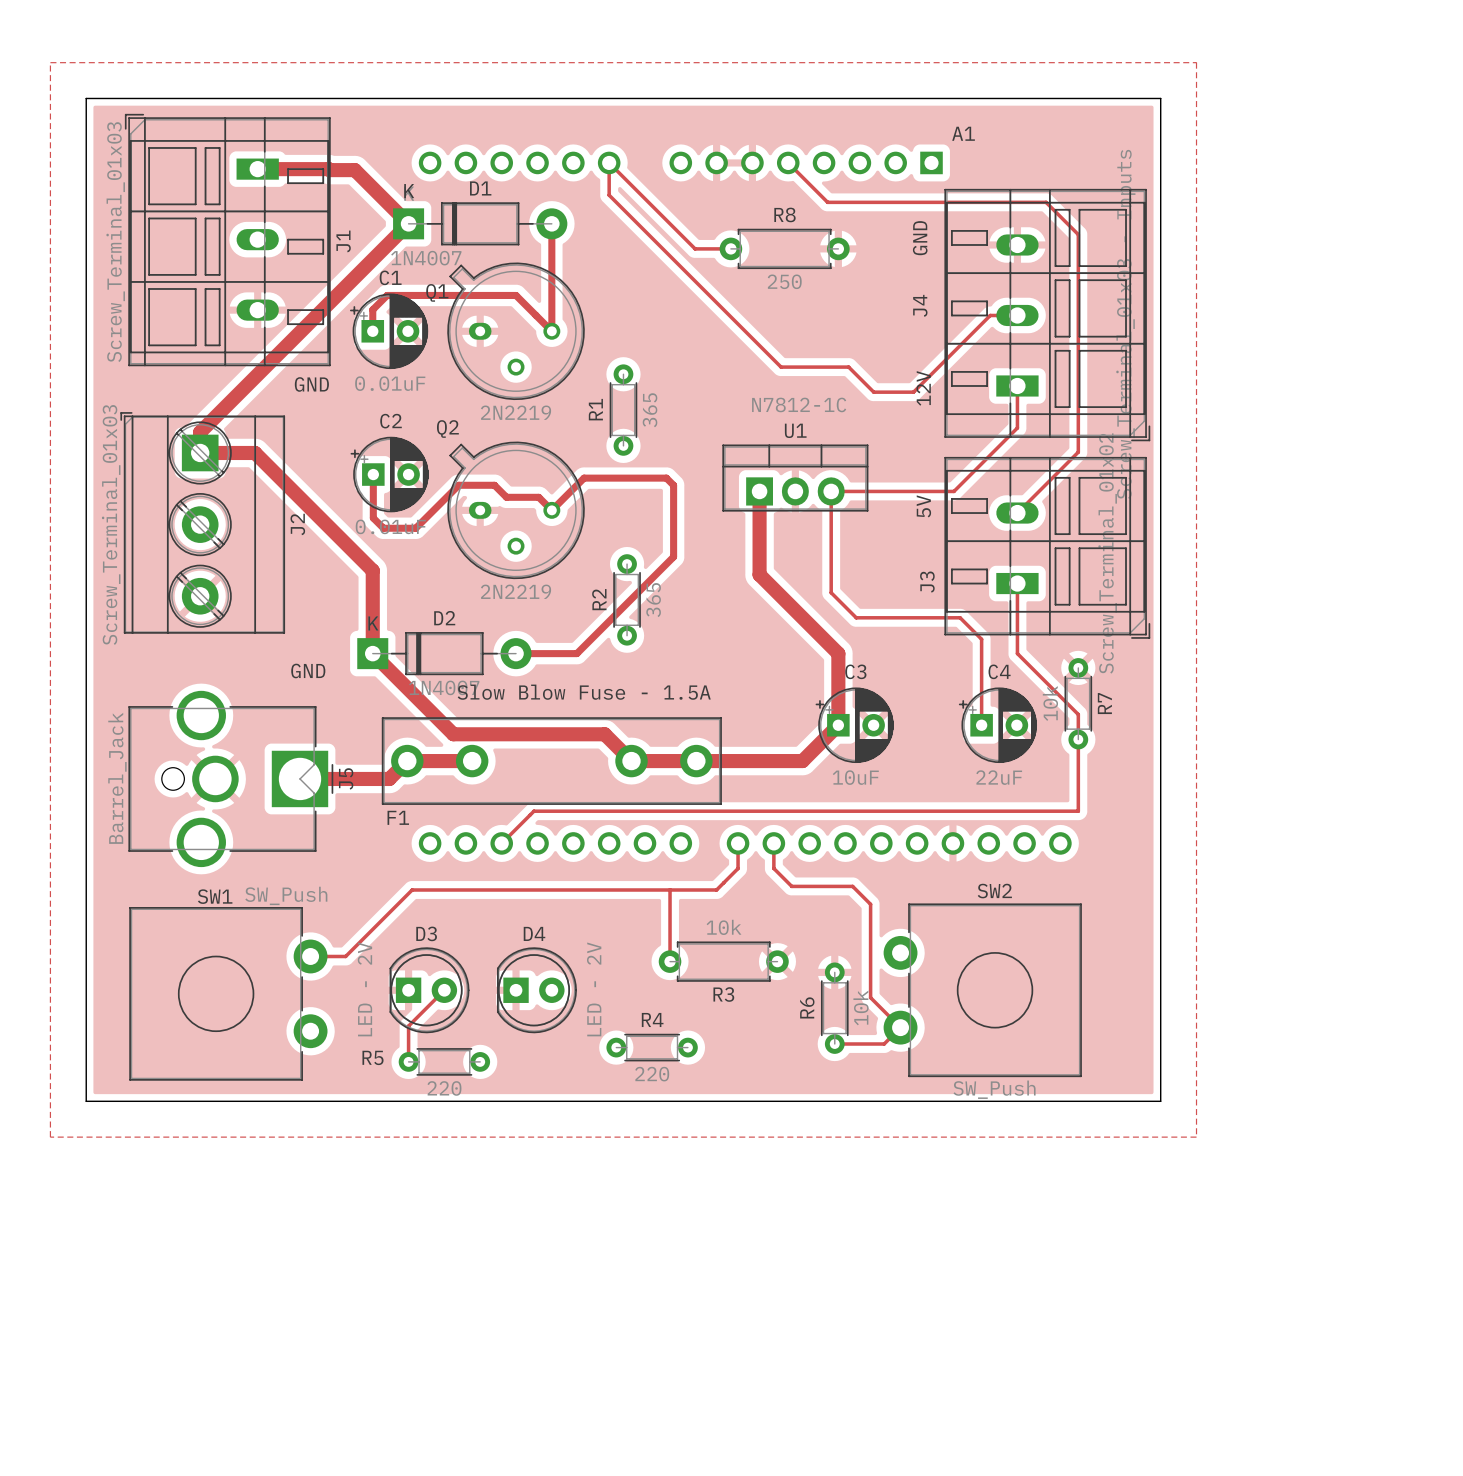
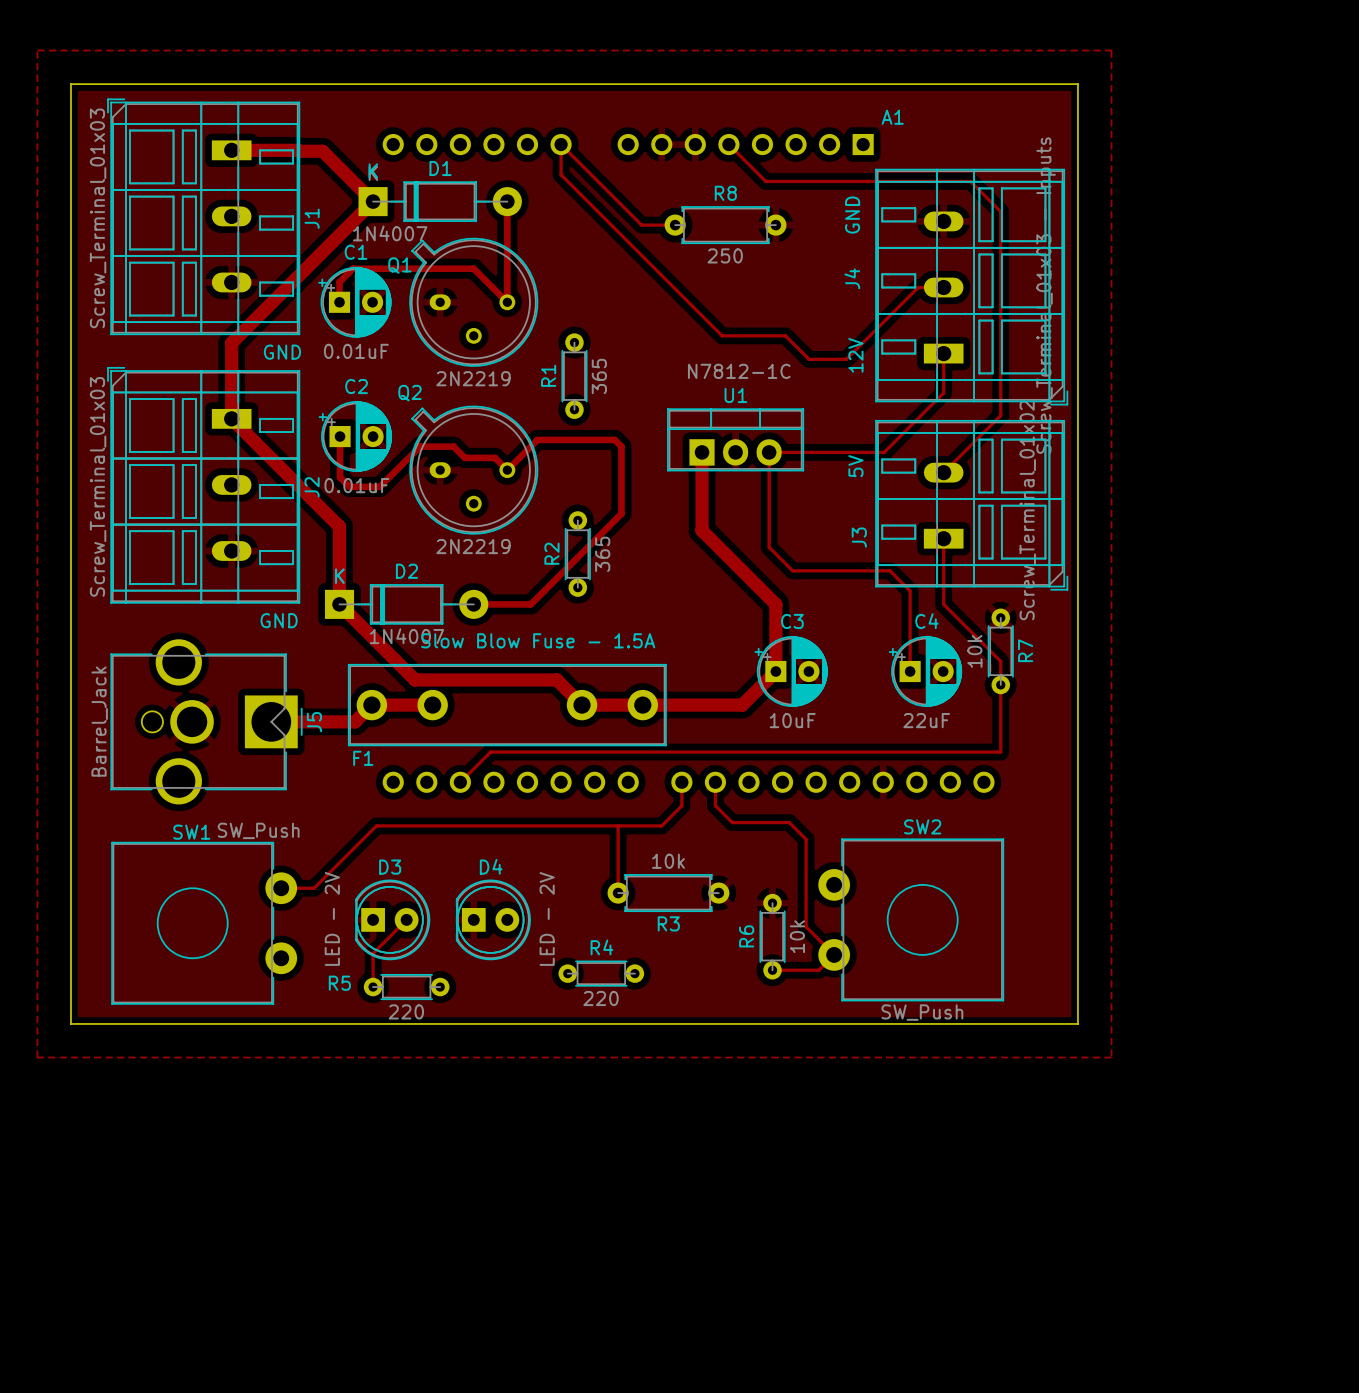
track: (257, 374) (200, 432) (200, 452) (255, 452) (257, 455) -> (231, 343) (231, 418)
J2 footprint: [120, 412, 286, 634] -> [107, 367, 301, 604]

